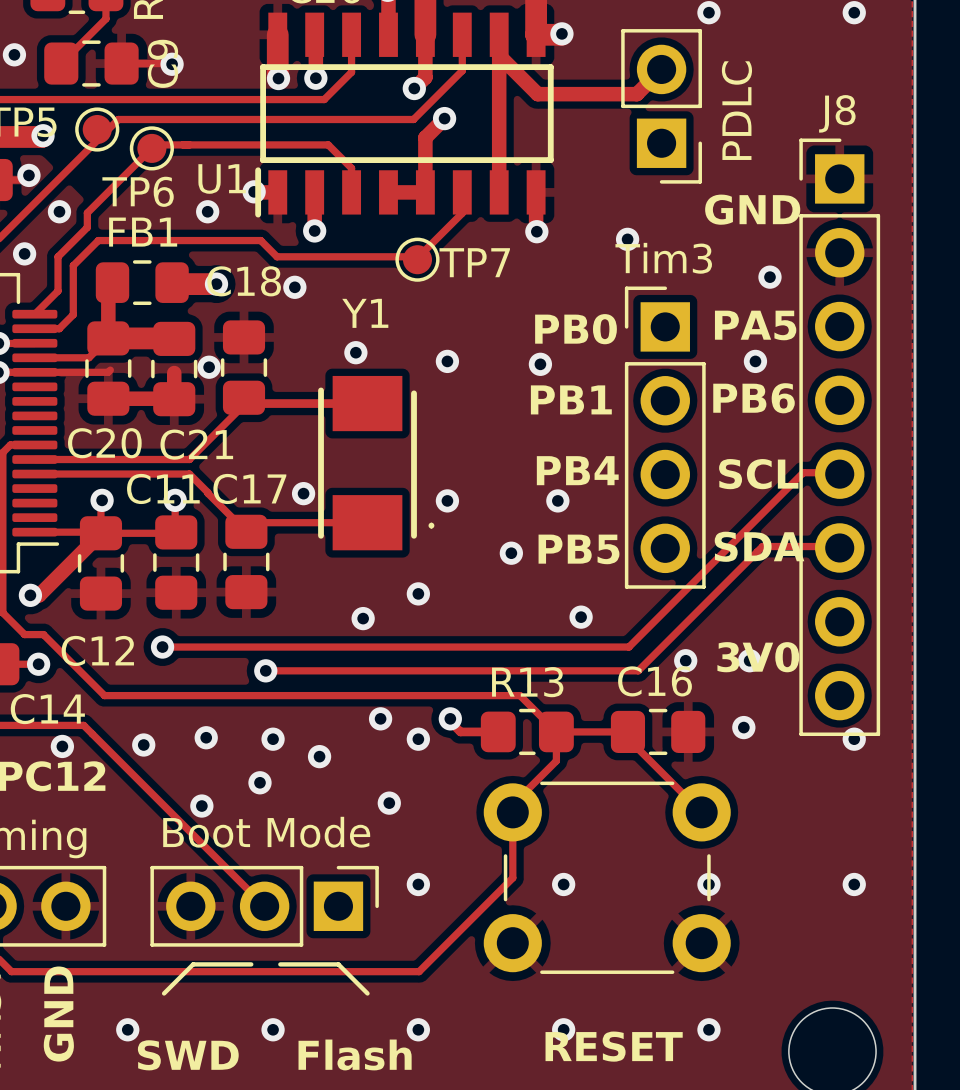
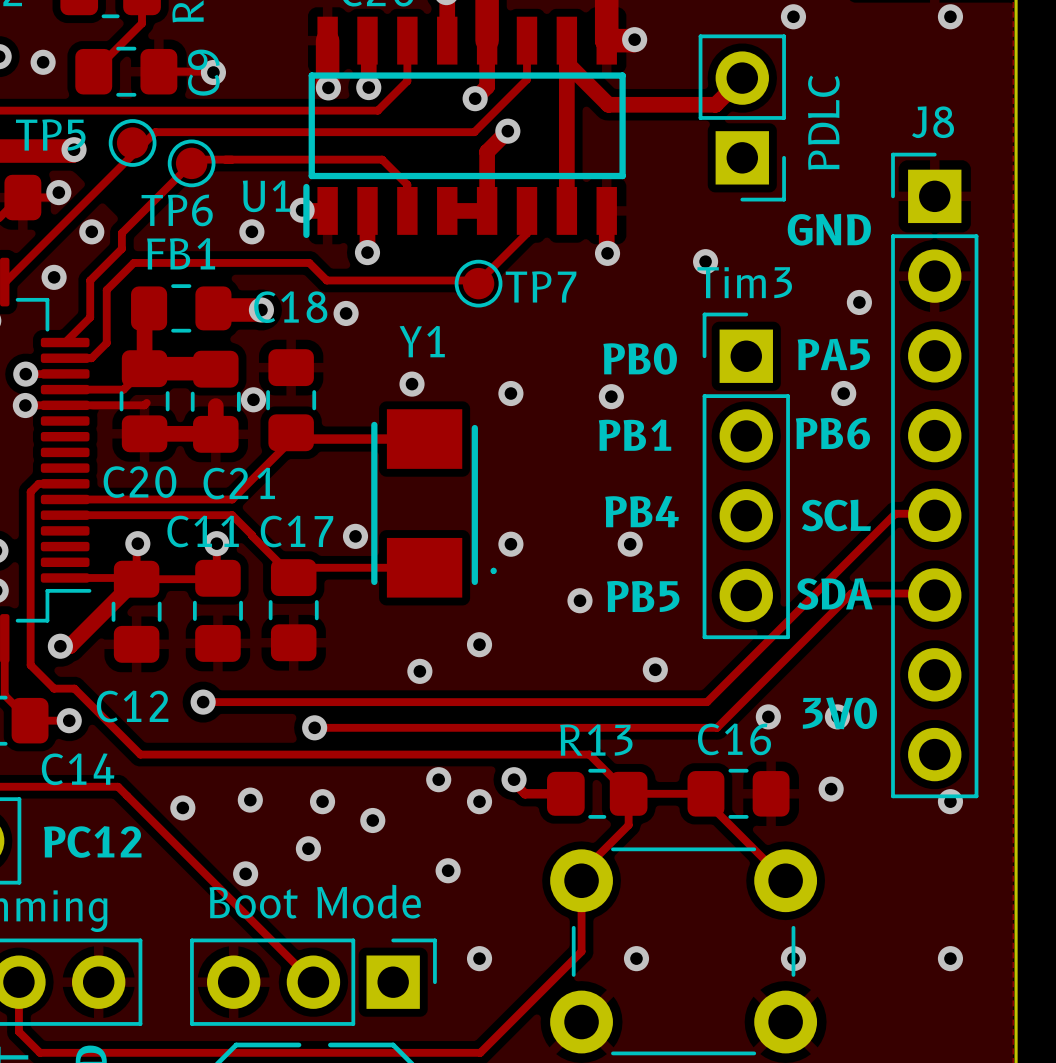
via: (62, 746) -> none

